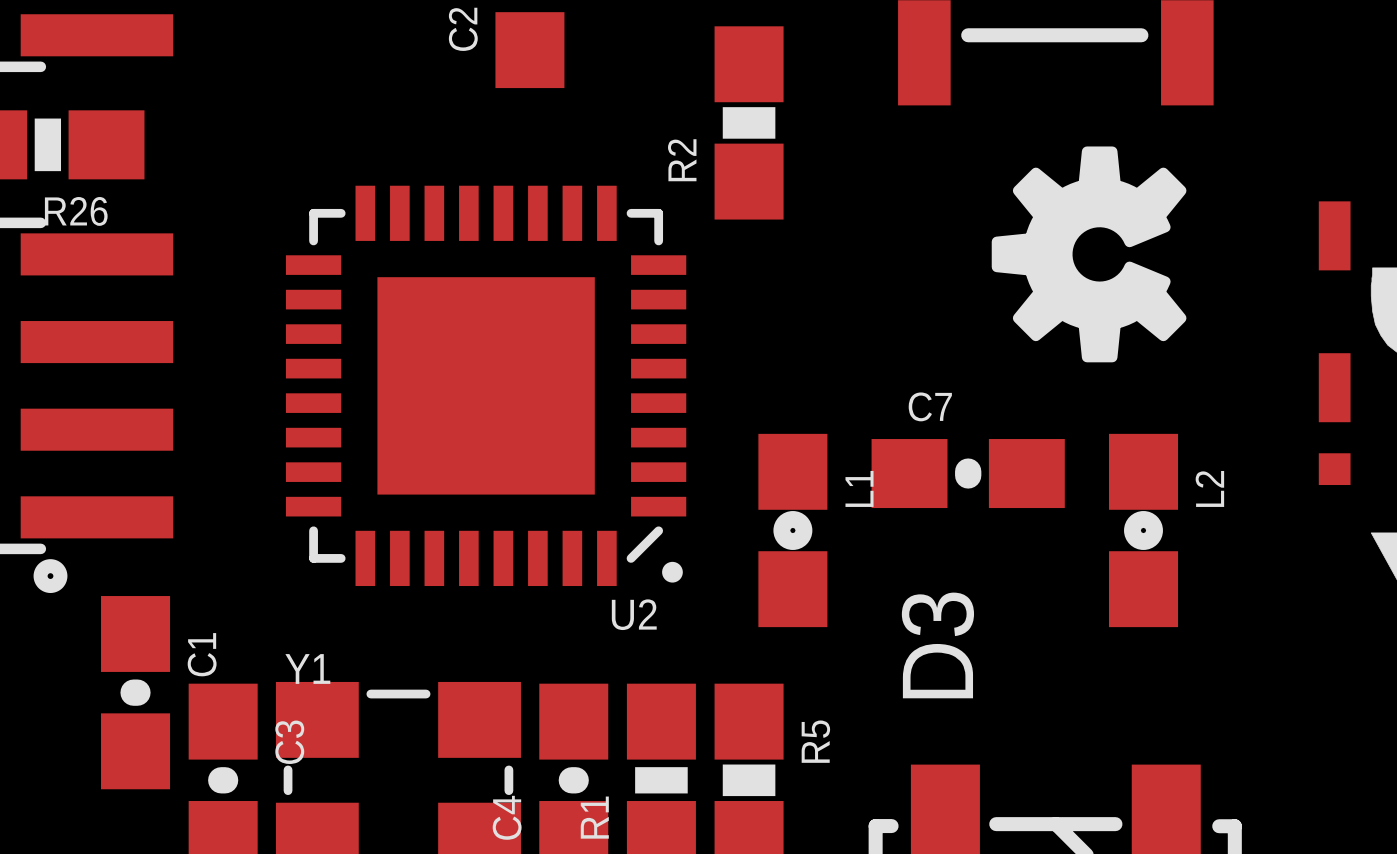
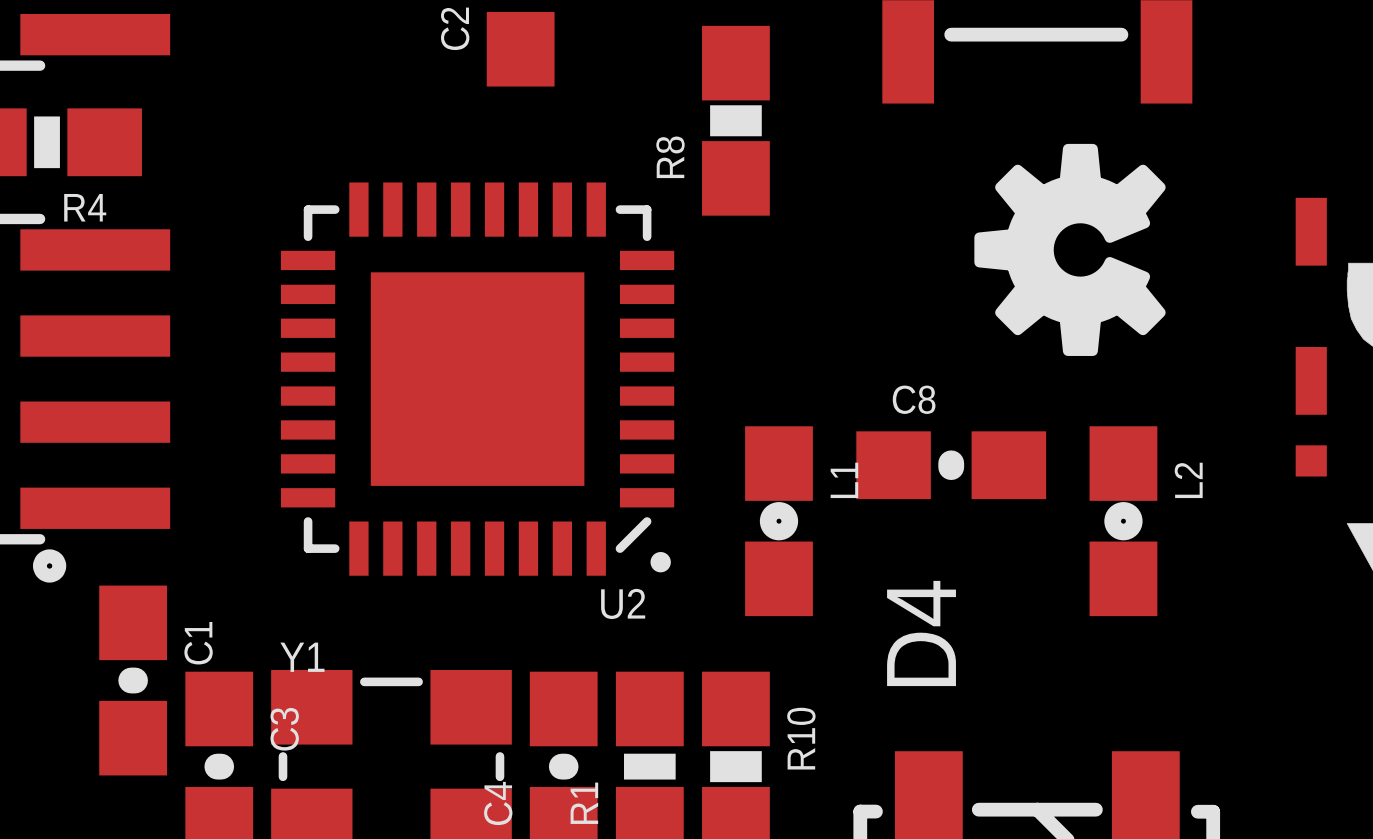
R2 name: R2 (682, 160) -> R8 (670, 157)
R26 name: R26 (76, 211) -> R4 (85, 207)
C7 name: C7 (930, 406) -> C8 (914, 399)
D3 name: D3 (937, 645) -> D4 (921, 633)
R5 name: R5 (815, 741) -> R10 (801, 738)

